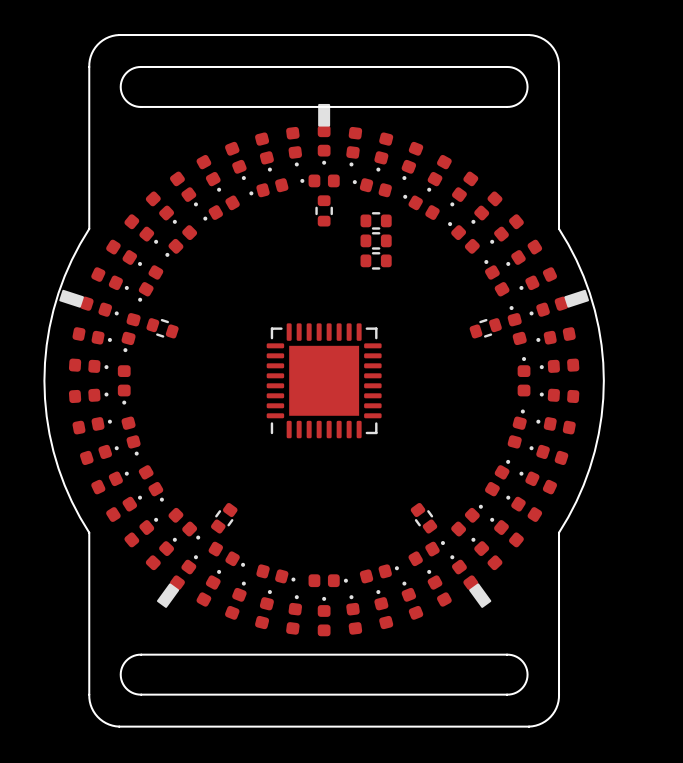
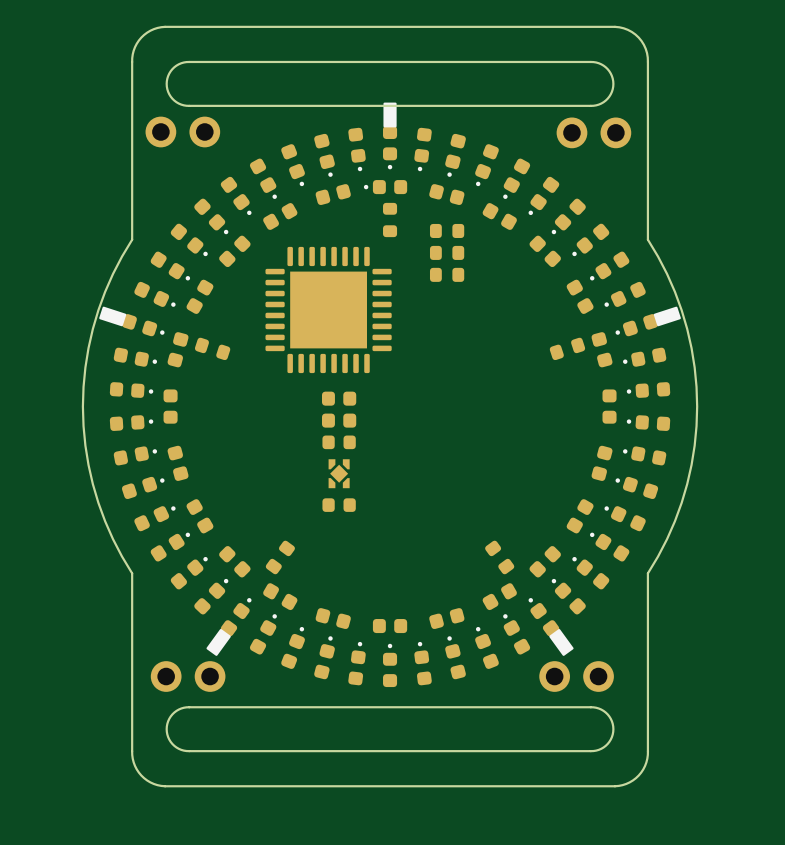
part: none -> (182, 131)
part: none -> (593, 132)
part footprint: [249, 178, 289, 198] -> [315, 184, 351, 206]
part footprint: [352, 178, 392, 198] -> [429, 184, 465, 206]
part footprint: [403, 194, 440, 220] -> [482, 203, 517, 230]
part footprint: [203, 195, 240, 221] -> [263, 203, 298, 230]
part footprint: [315, 195, 333, 227] -> [383, 202, 398, 238]
part footprint: [360, 212, 392, 230] -> [429, 223, 465, 239]
part footprint: [448, 222, 480, 254] -> [529, 235, 561, 268]
part footprint: [165, 225, 198, 257] -> [219, 235, 251, 268]
part footprint: [360, 232, 392, 250] -> [429, 245, 465, 260]
part footprint: [360, 252, 392, 270] -> [429, 267, 465, 282]
part footprint: [484, 260, 510, 297] -> [566, 279, 594, 314]
part footprint: [138, 265, 164, 302] -> [186, 279, 214, 314]
part: none -> (328, 309)
part footprint: [507, 306, 527, 346] -> [591, 332, 613, 368]
part footprint: [121, 313, 141, 353] -> [167, 332, 189, 368]
part footprint: [146, 318, 179, 339] -> [194, 337, 231, 361]
part footprint: [469, 318, 502, 339] -> [549, 337, 586, 361]
part footprint: [517, 357, 531, 397] -> [602, 389, 617, 424]
part footprint: [117, 365, 131, 405] -> [163, 389, 178, 424]
part: none -> (339, 398)
part: (324, 380) -> none
part: none -> (339, 420)
part footprint: [507, 409, 527, 449] -> [591, 445, 613, 481]
part: none -> (339, 442)
part footprint: [121, 416, 141, 456] -> [167, 445, 189, 481]
part: none -> (339, 473)
part footprint: [484, 459, 511, 497] -> [566, 499, 594, 534]
part footprint: [138, 465, 164, 502] -> [186, 499, 214, 534]
part: none -> (339, 505)
part footprint: [211, 502, 238, 534] -> [265, 540, 295, 575]
part footprint: [410, 502, 438, 534] -> [485, 540, 515, 575]
part footprint: [451, 504, 483, 537] -> [529, 546, 561, 578]
part footprint: [168, 507, 201, 540] -> [219, 546, 251, 578]
part footprint: [208, 541, 246, 567] -> [263, 583, 298, 611]
part footprint: [408, 541, 445, 567] -> [482, 583, 517, 611]
part footprint: [256, 564, 296, 584] -> [315, 608, 351, 630]
part footprint: [359, 564, 399, 584] -> [429, 608, 465, 630]
part footprint: [308, 574, 348, 588] -> [372, 619, 408, 634]
part: none -> (188, 676)
part: none -> (576, 676)

